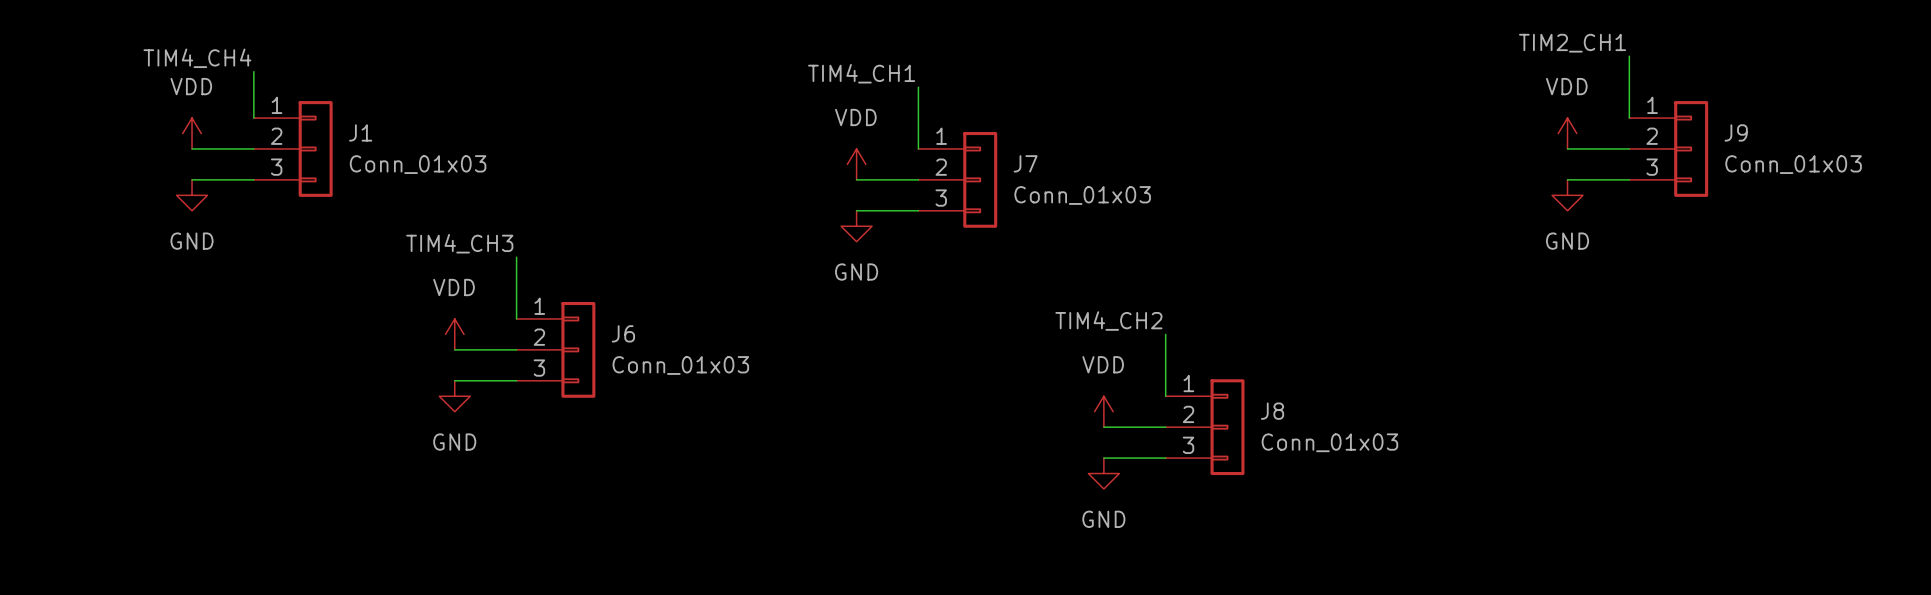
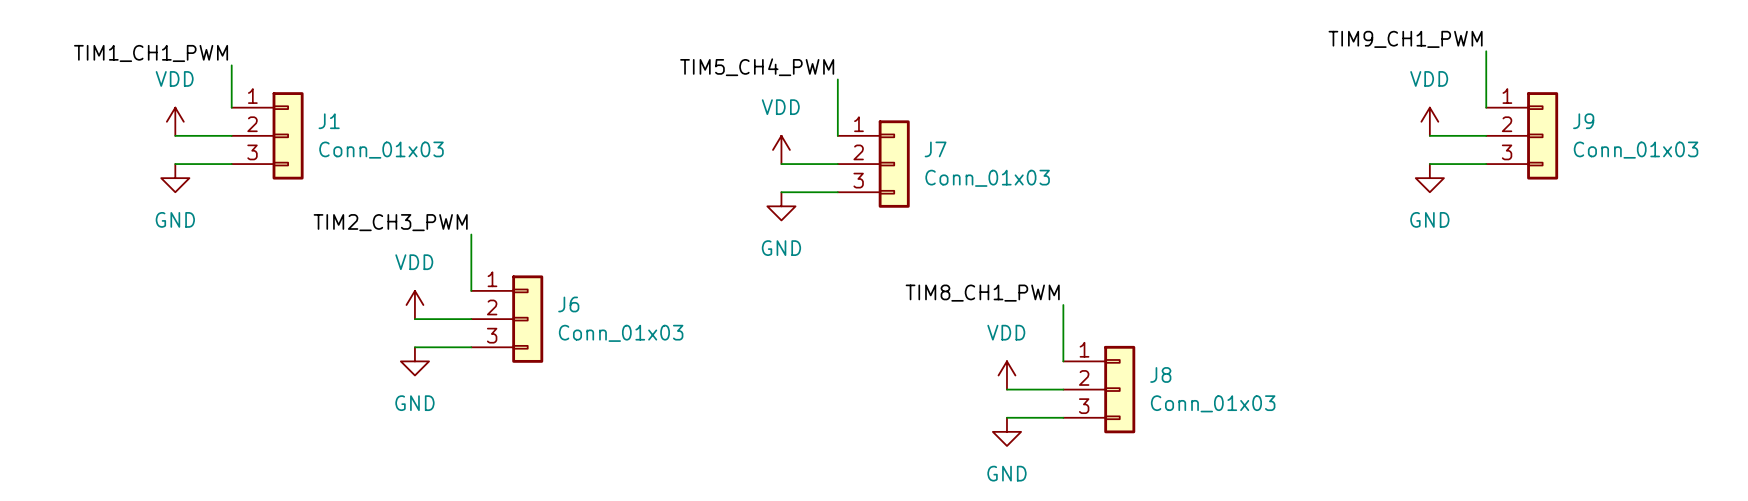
label: TIM2_CH1 (1572, 43) -> TIM9_CH1_PWM (1405, 39)
label: TIM4_CH4 (197, 58) -> TIM1_CH1_PWM (151, 53)
label: TIM4_CH1 (861, 73) -> TIM5_CH4_PWM (757, 67)
label: TIM4_CH3 (459, 243) -> TIM2_CH3_PWM (390, 222)
label: TIM4_CH2 (1108, 321) -> TIM8_CH1_PWM (982, 293)

